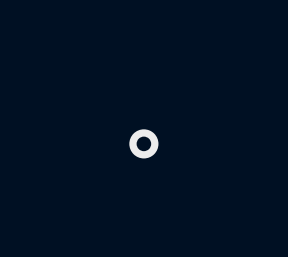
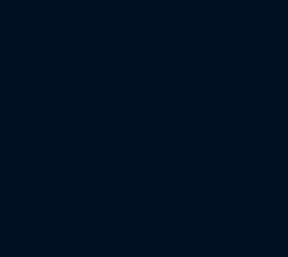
via: (143, 143) -> none

